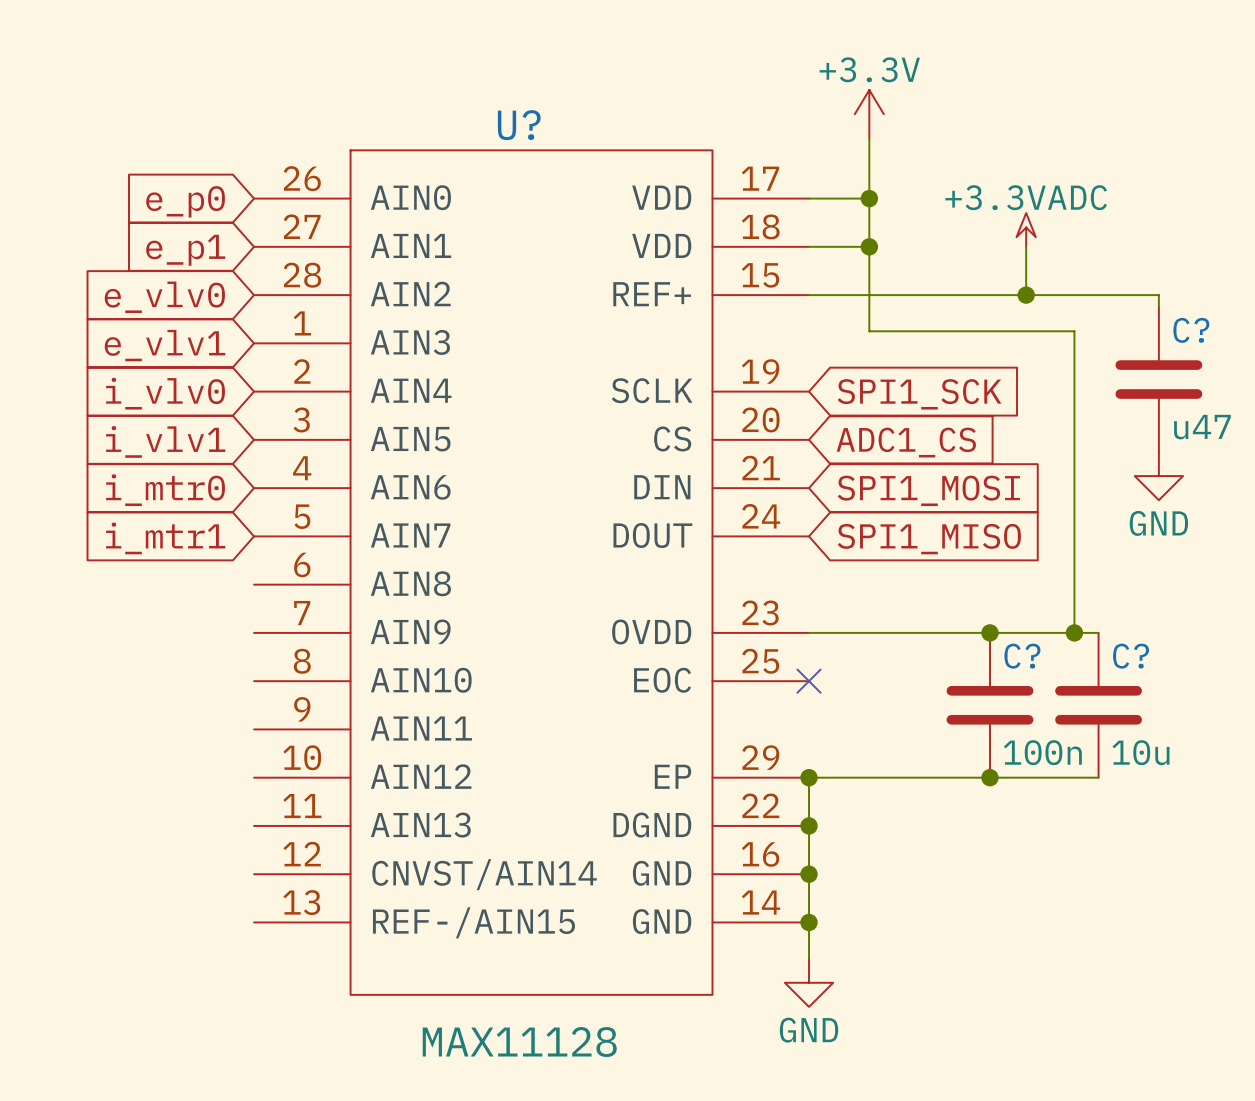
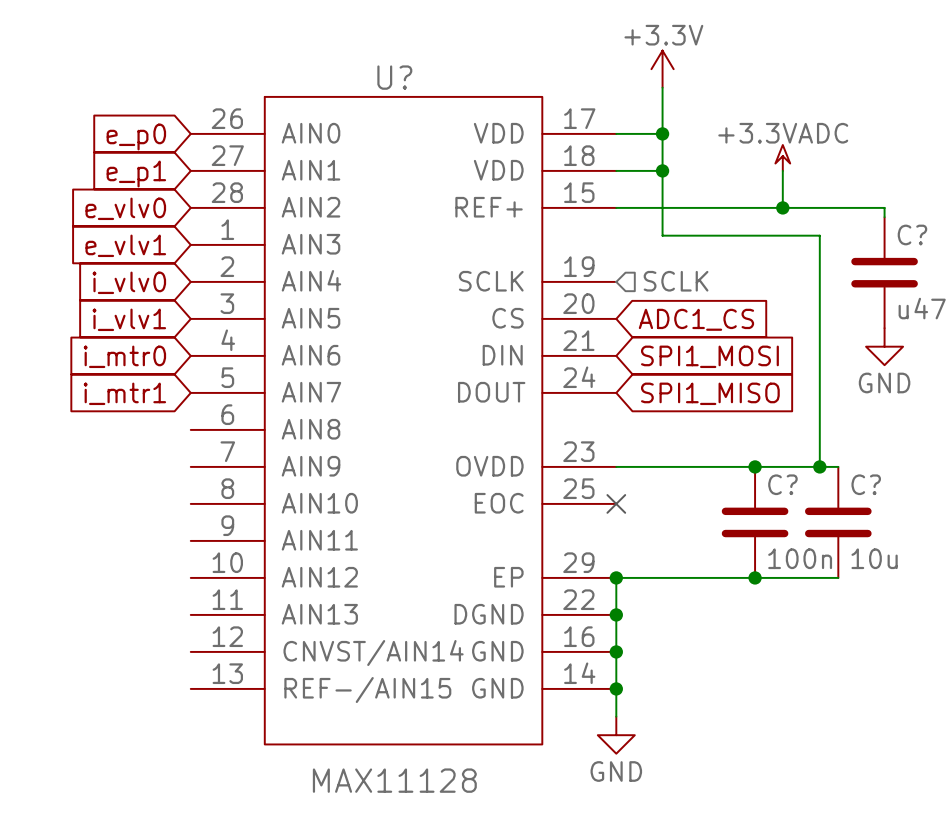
hierarchical label: none -> SCLK (676, 281)
global label: SPI1_SCK (919, 394) -> none

